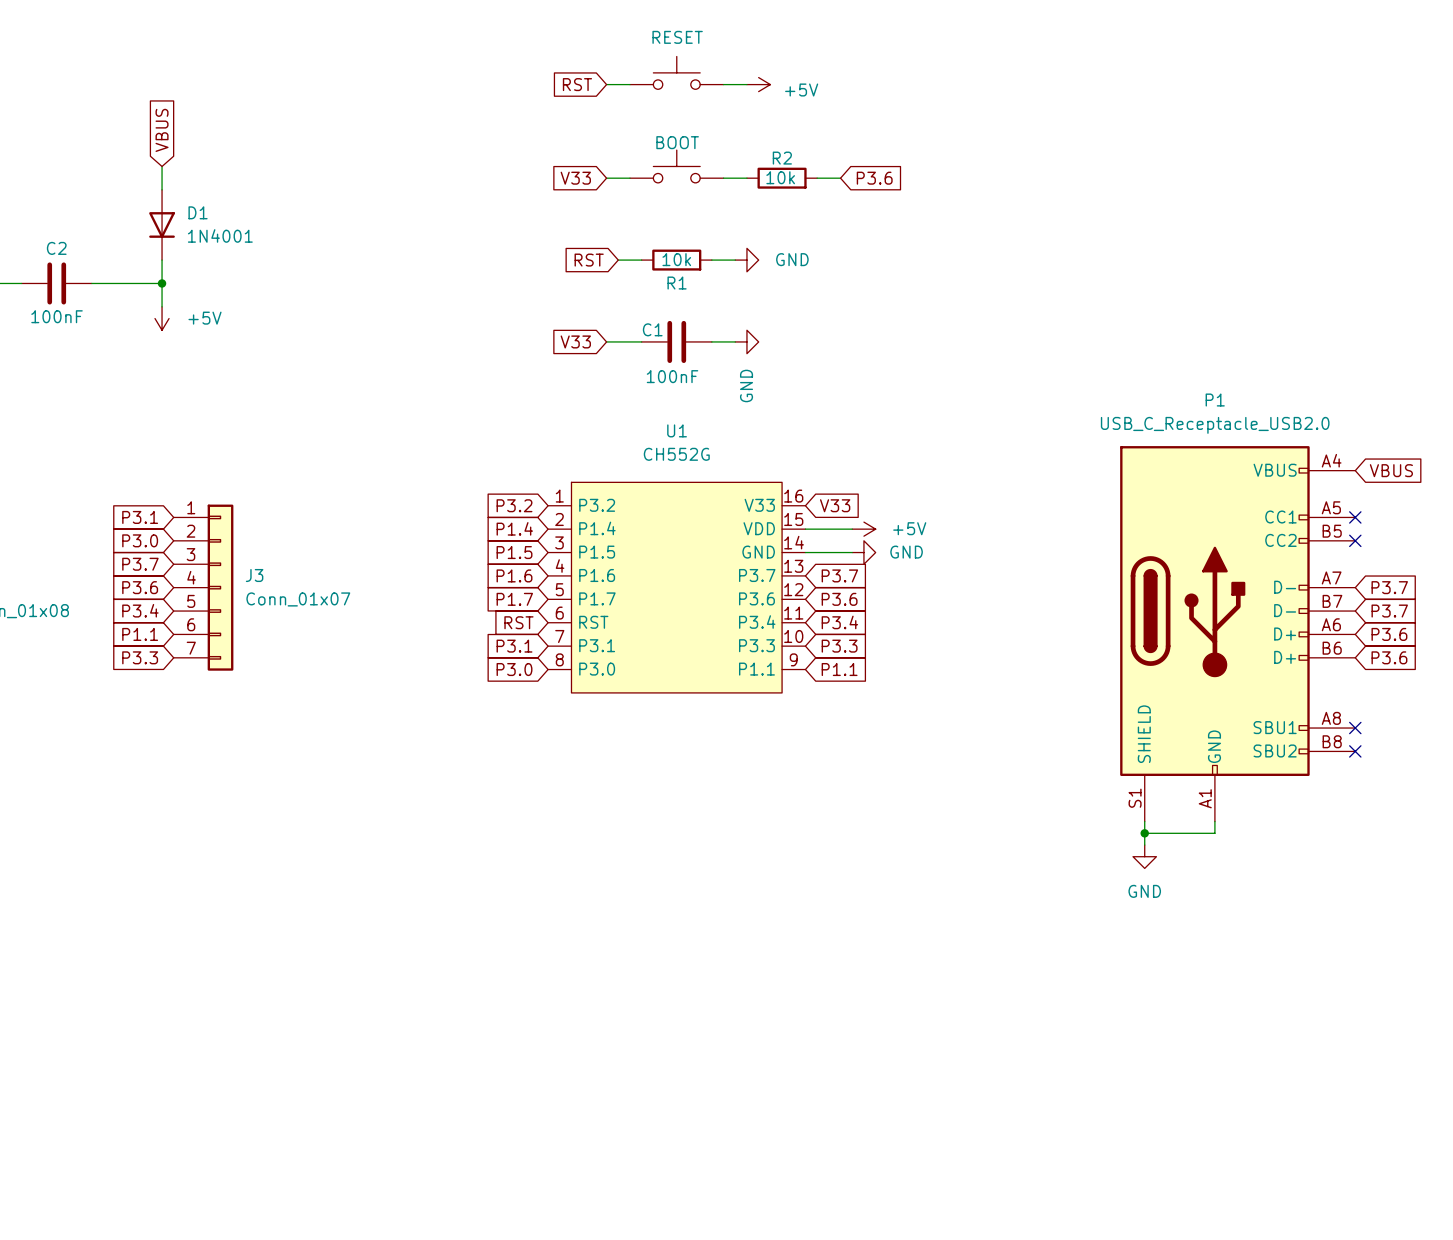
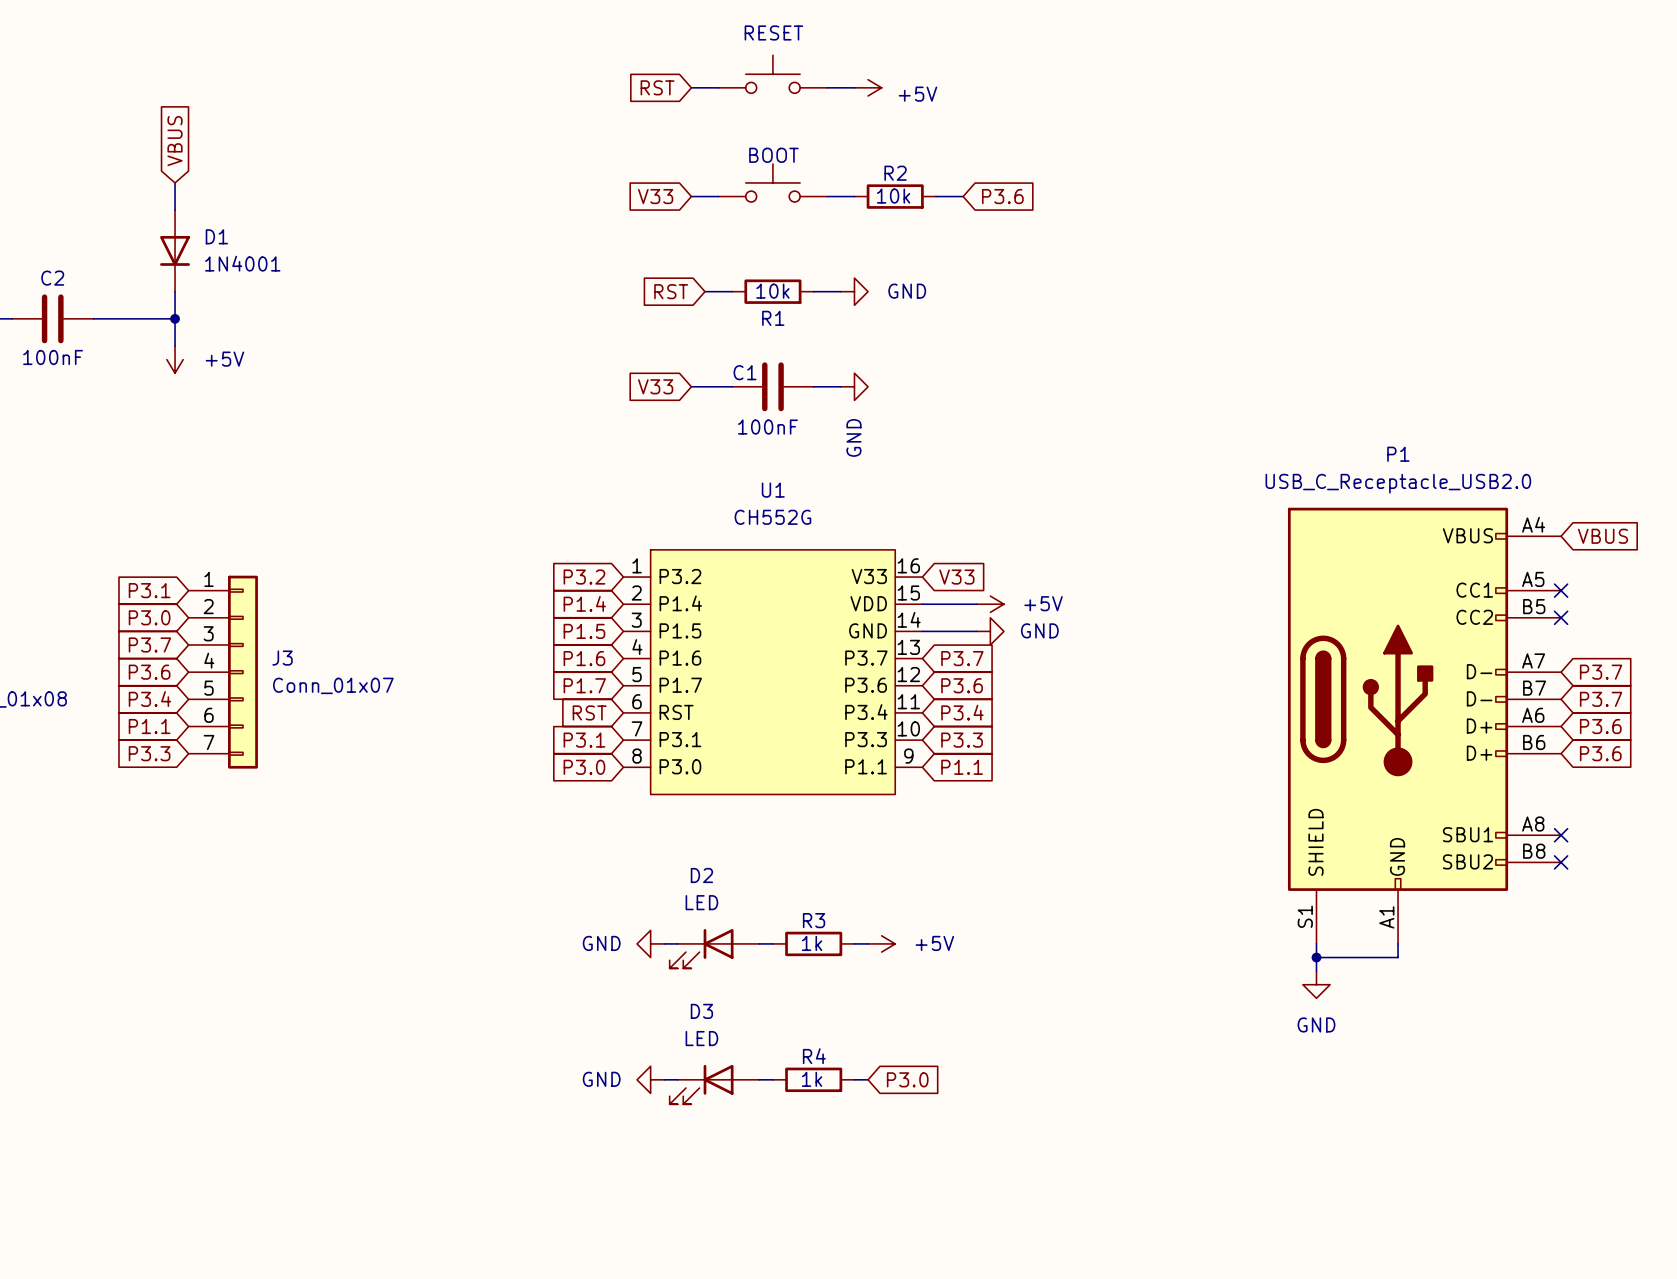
power symbol: none -> GND (650, 943)
wire: none -> (664, 943) (677, 943)
wire: none -> (759, 943) (772, 943)
R3: none -> 1k (813, 943)
wire: none -> (854, 943) (868, 943)
power symbol: none -> +5V (881, 943)
D2: none -> LED (714, 948)
power symbol: none -> GND (650, 1079)
wire: none -> (664, 1079) (677, 1079)
wire: none -> (759, 1079) (772, 1079)
R4: none -> 1k (813, 1079)
wire: none -> (854, 1079) (868, 1079)
global label: none -> P3.0 (907, 1079)
D3: none -> LED (714, 1084)

